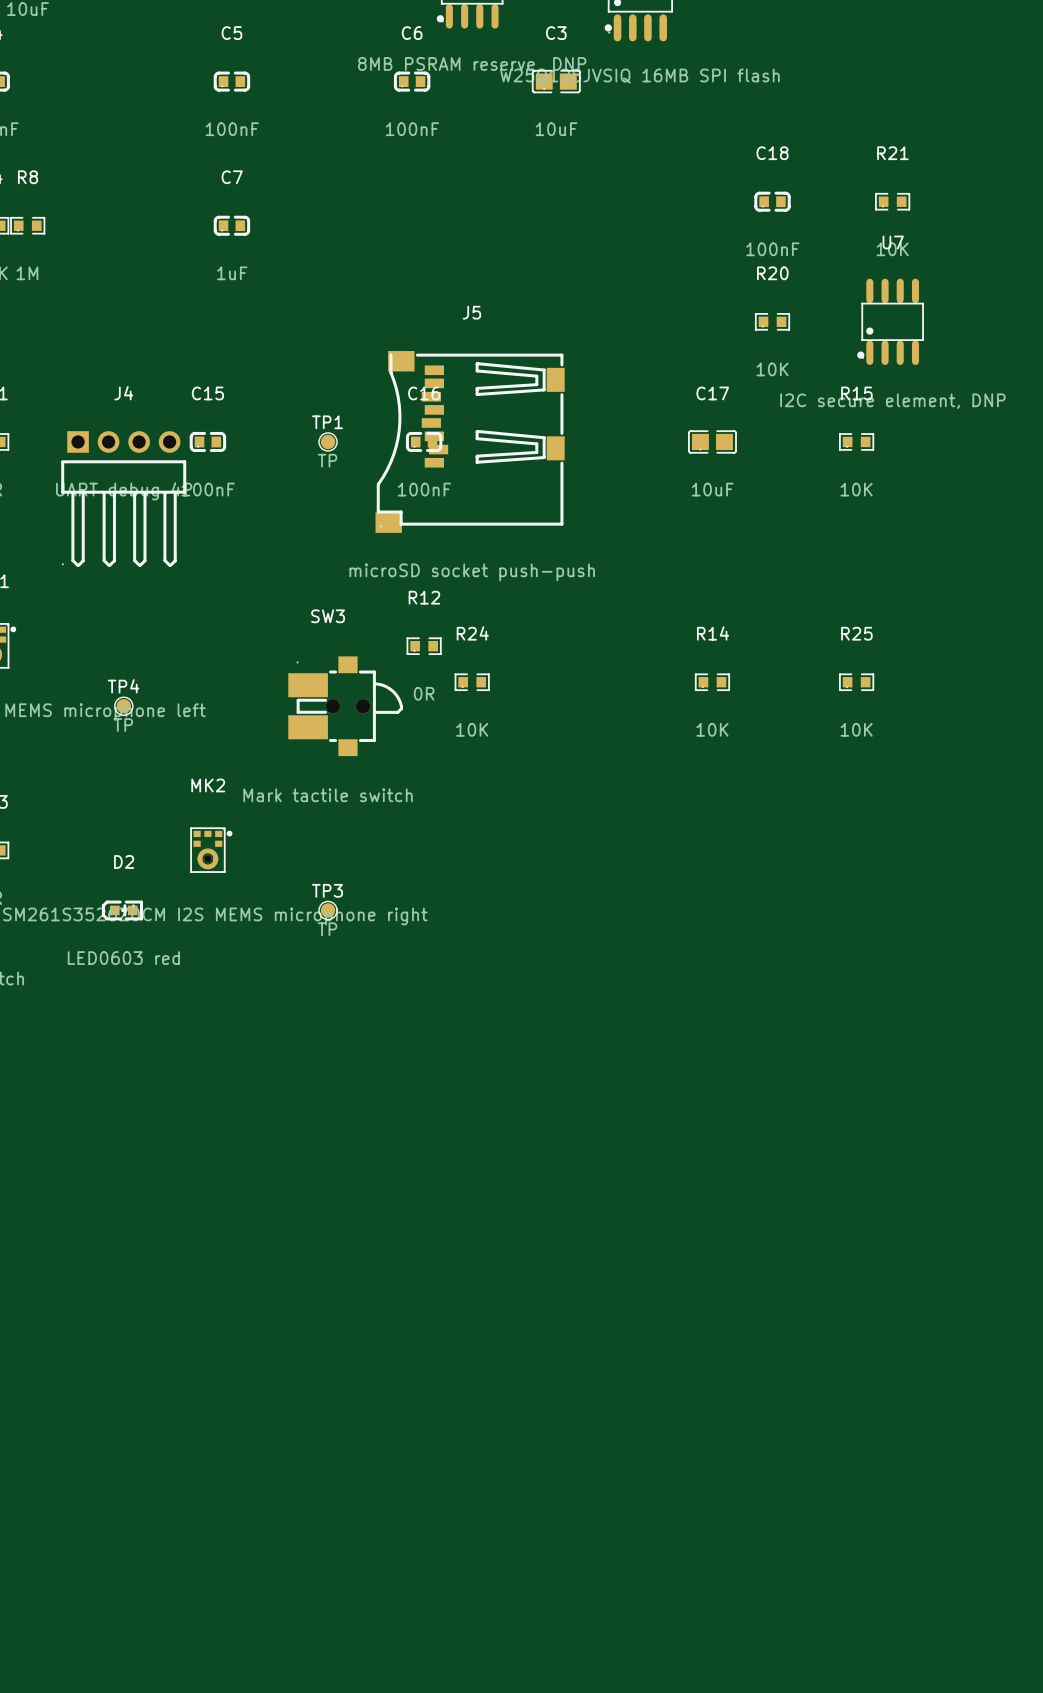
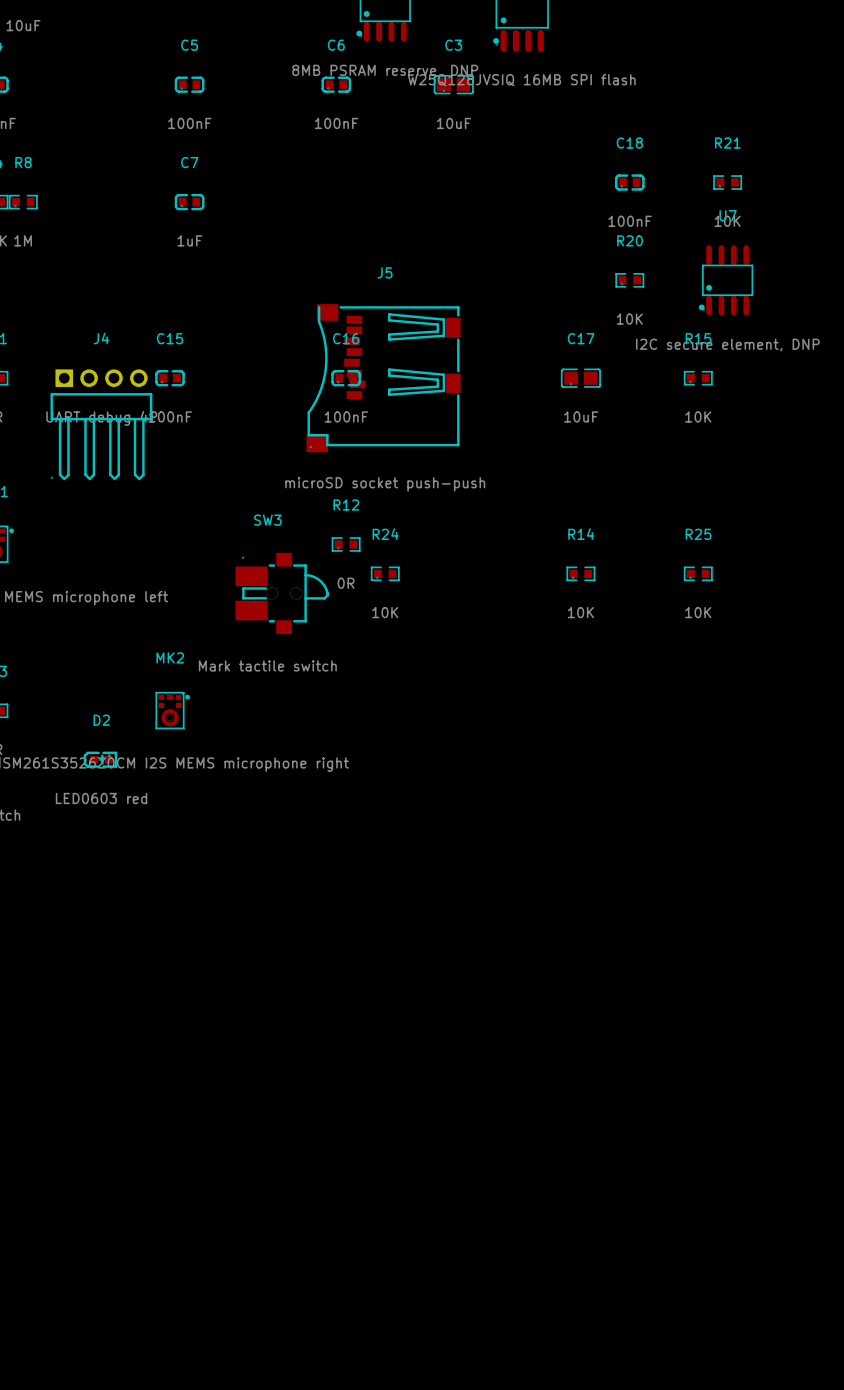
TP1: TP (328, 441) -> none
TP4: TP (123, 706) -> none
TP3: TP (328, 910) -> none

